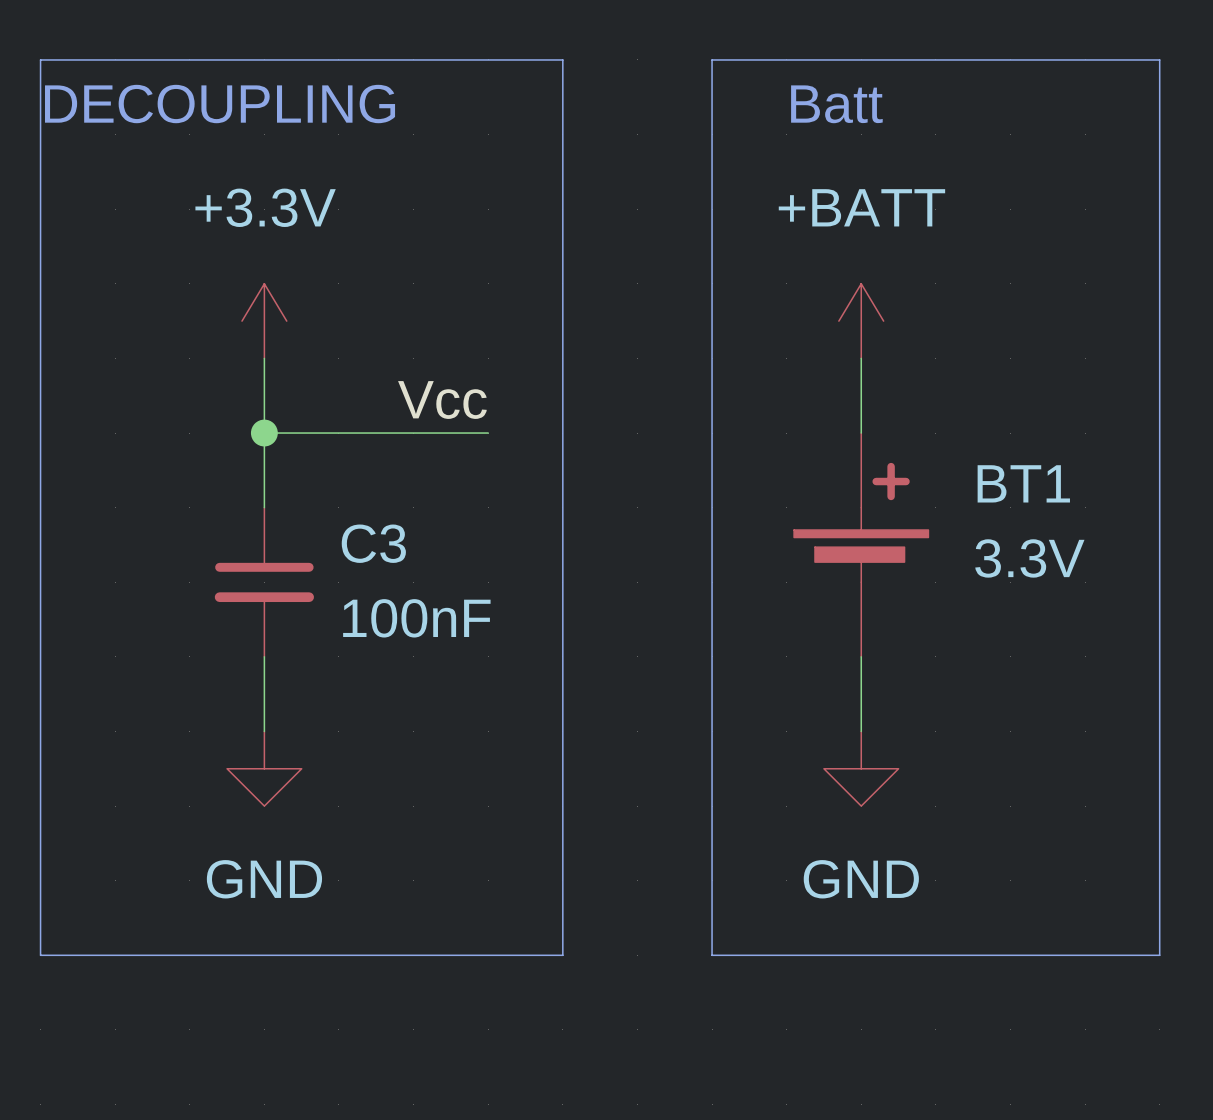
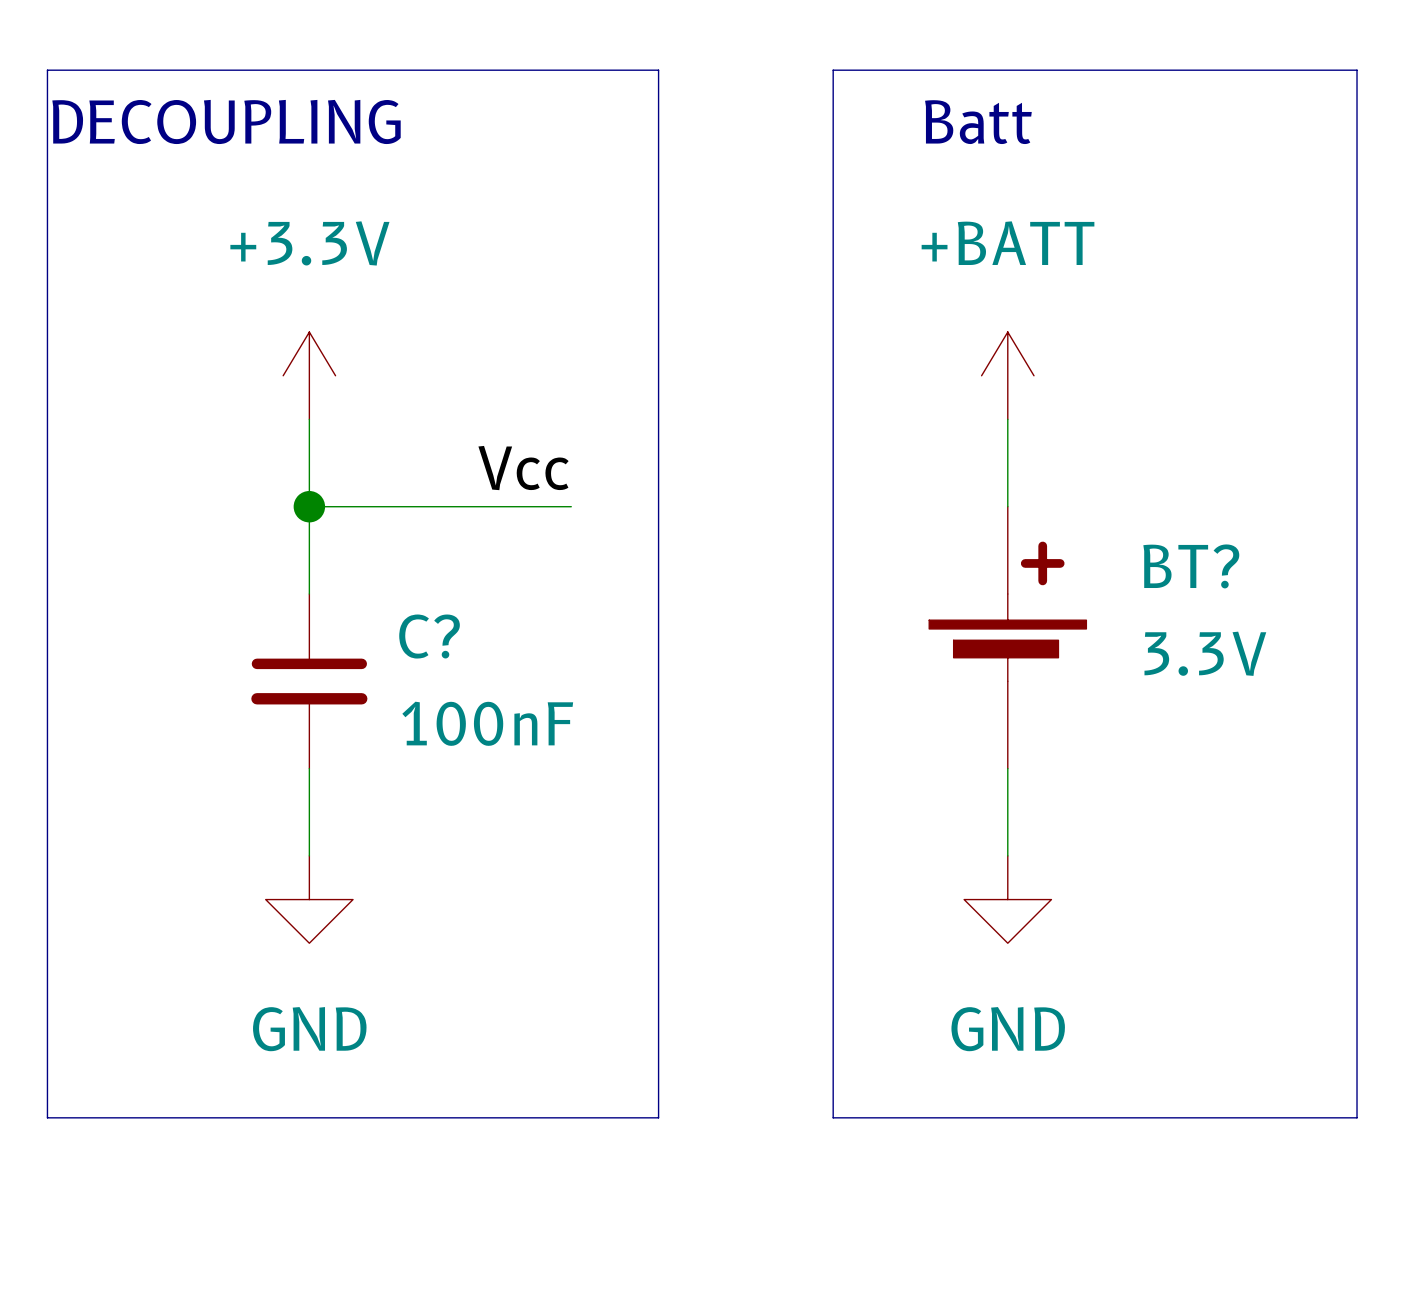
BT1 name: BT1 (1023, 483) -> BT? (1191, 566)
C3 name: C3 (373, 543) -> C? (429, 636)

